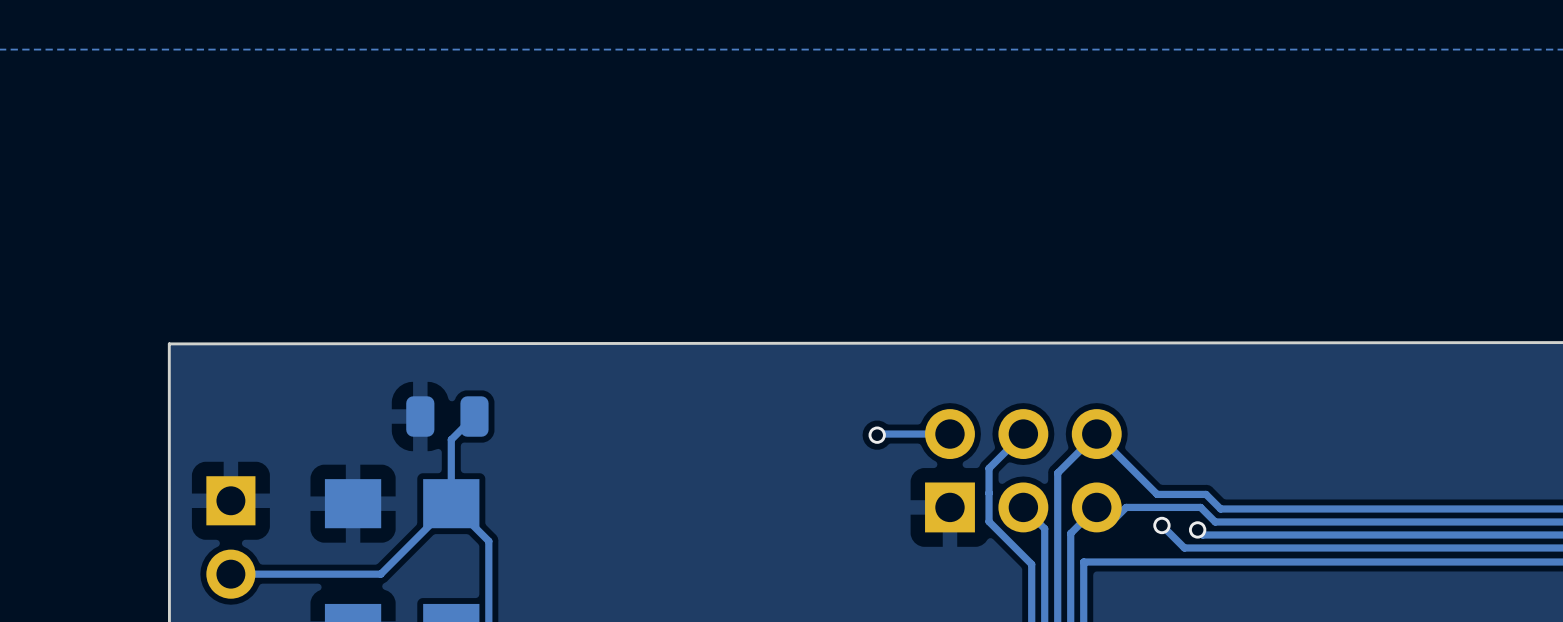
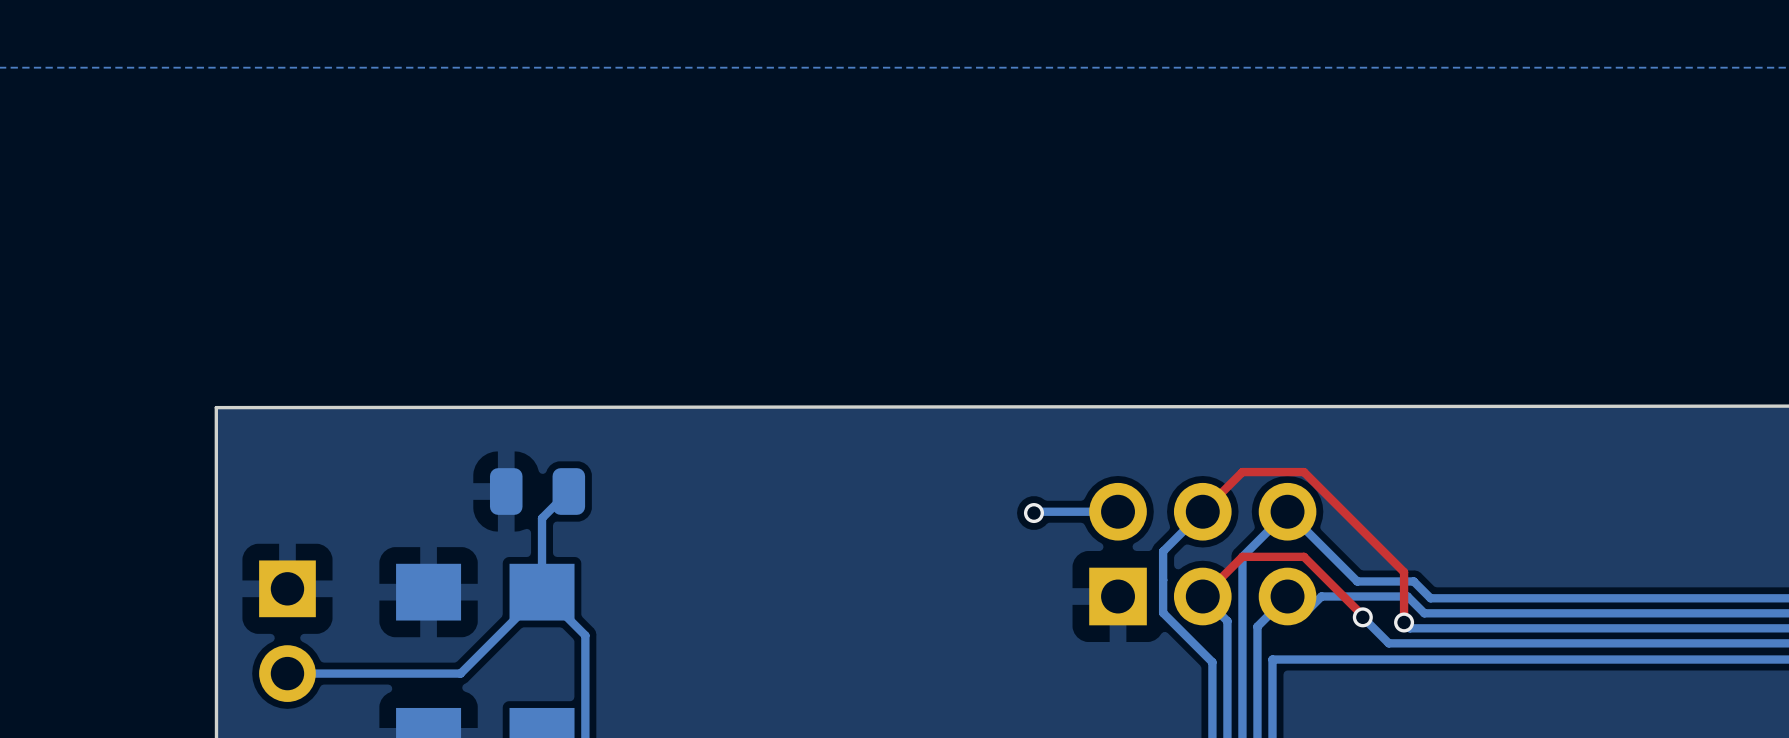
top track: none -> (1202, 511) (1242, 472) (1303, 472) (1404, 572) (1404, 622)
top track: none -> (1202, 596) (1242, 556) (1303, 556) (1362, 615)

